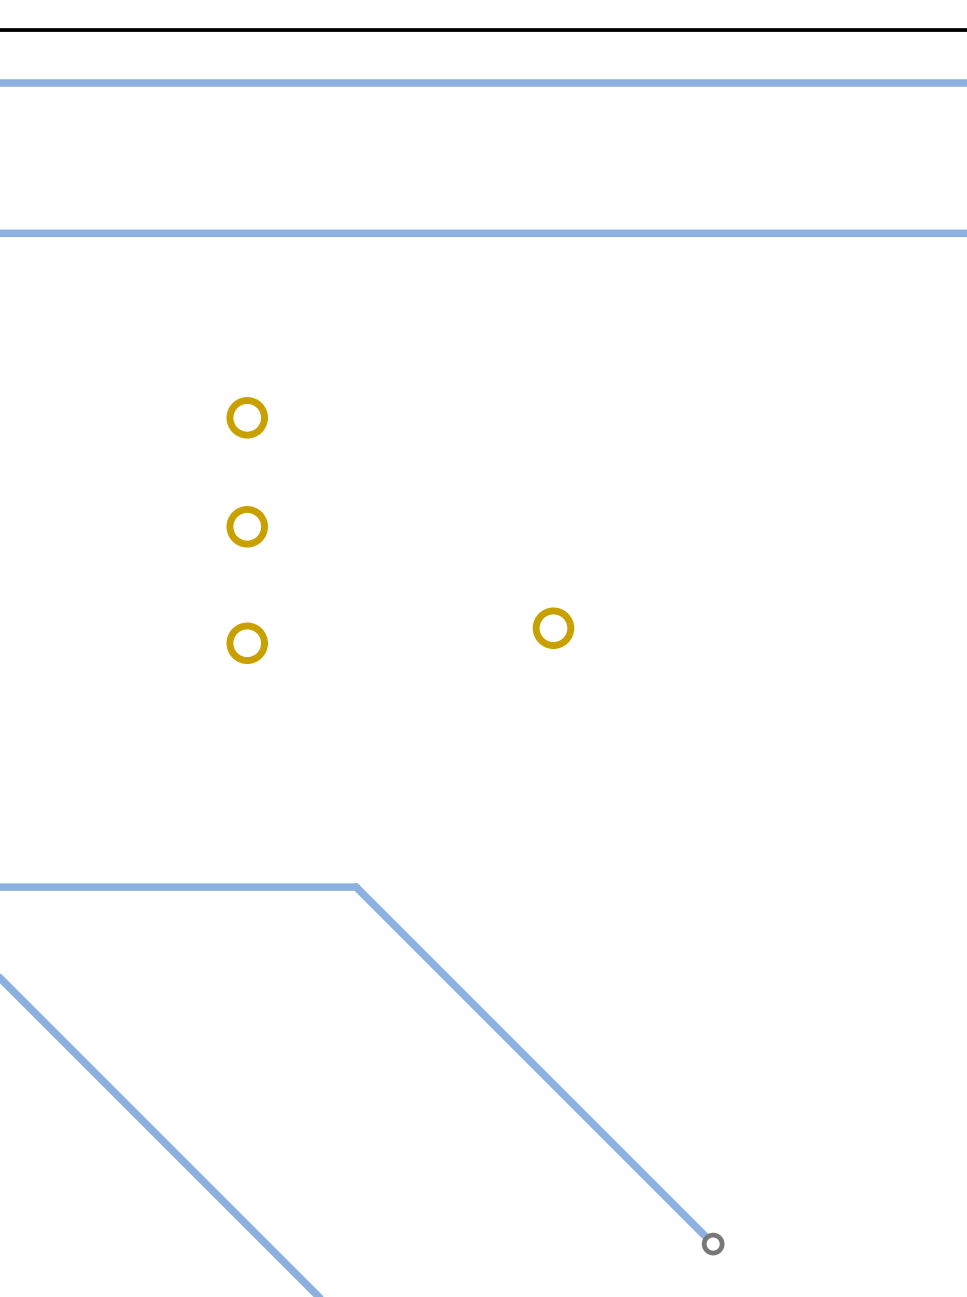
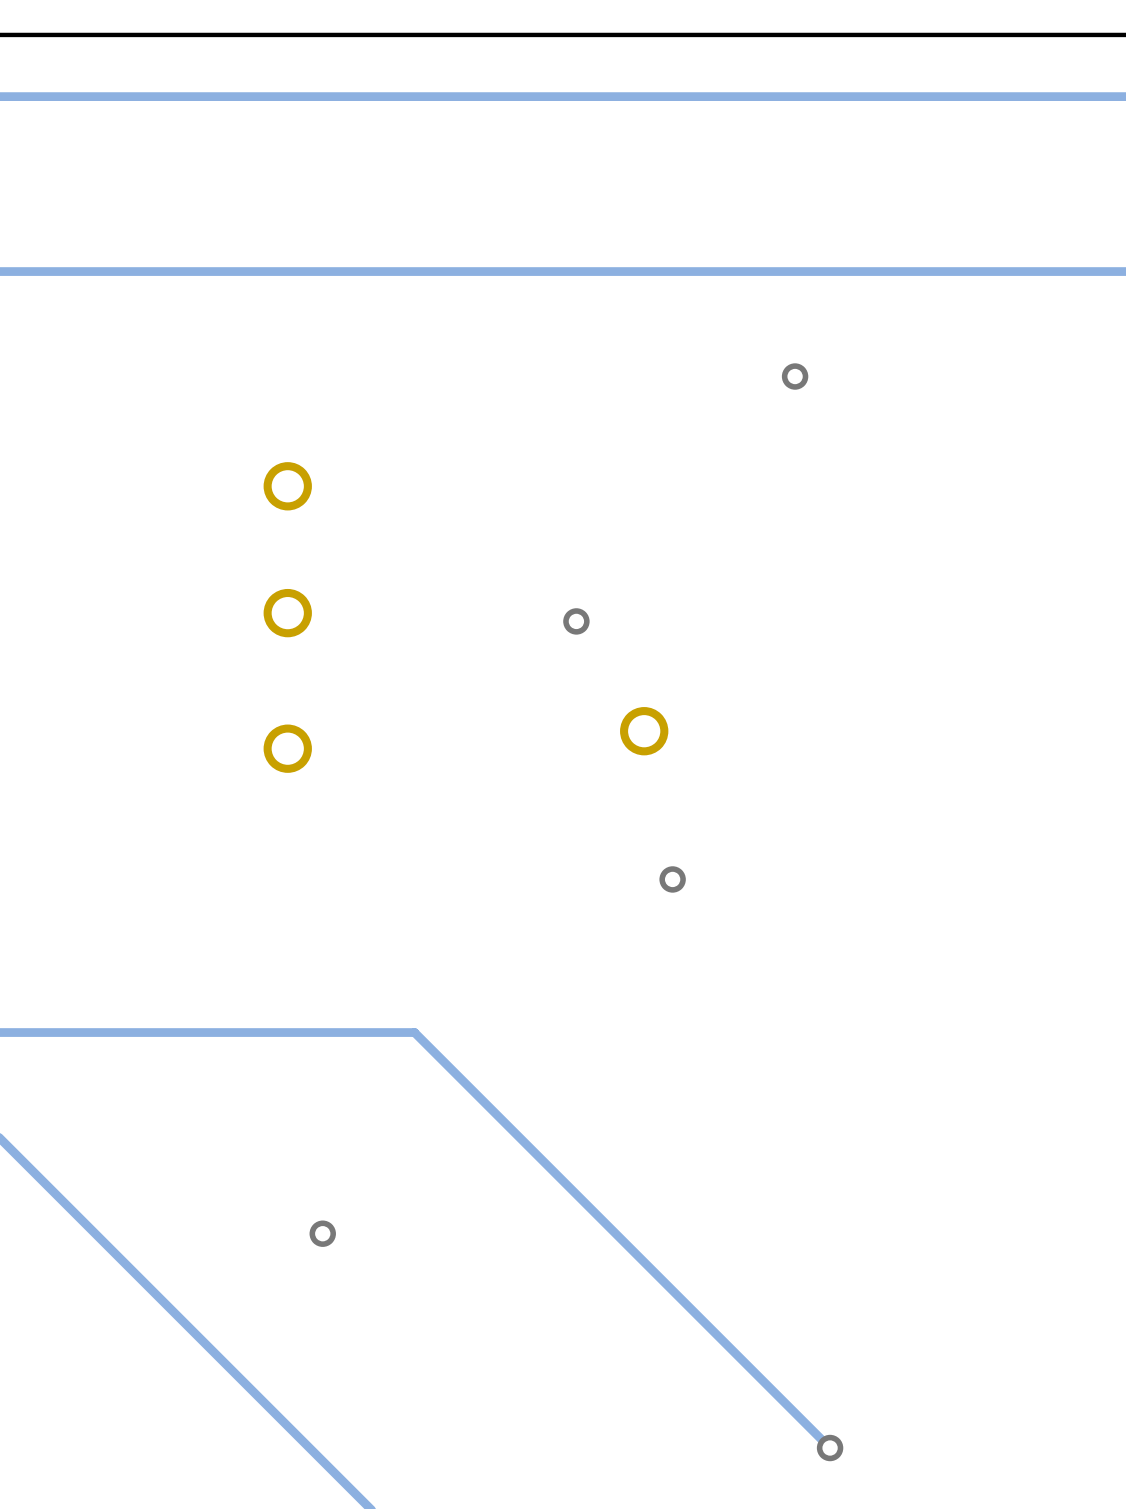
via: none -> (795, 376)
via: none -> (576, 621)
via: none -> (672, 879)
via: none -> (322, 1233)

